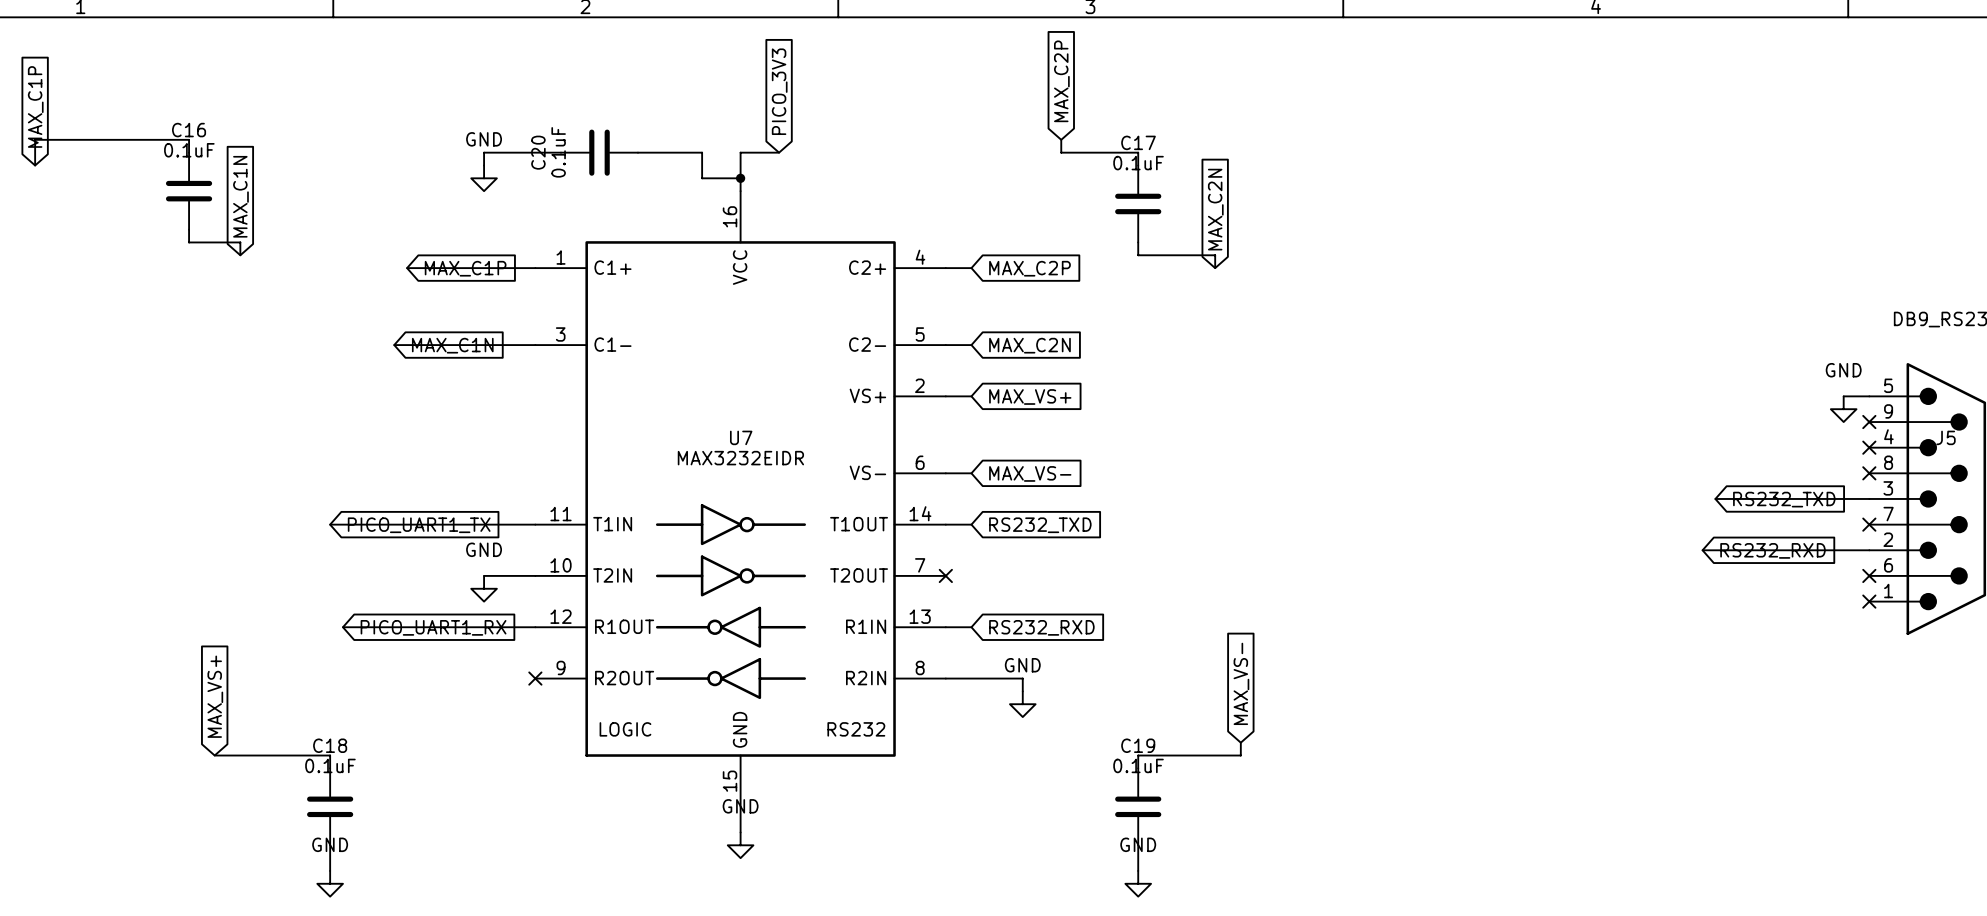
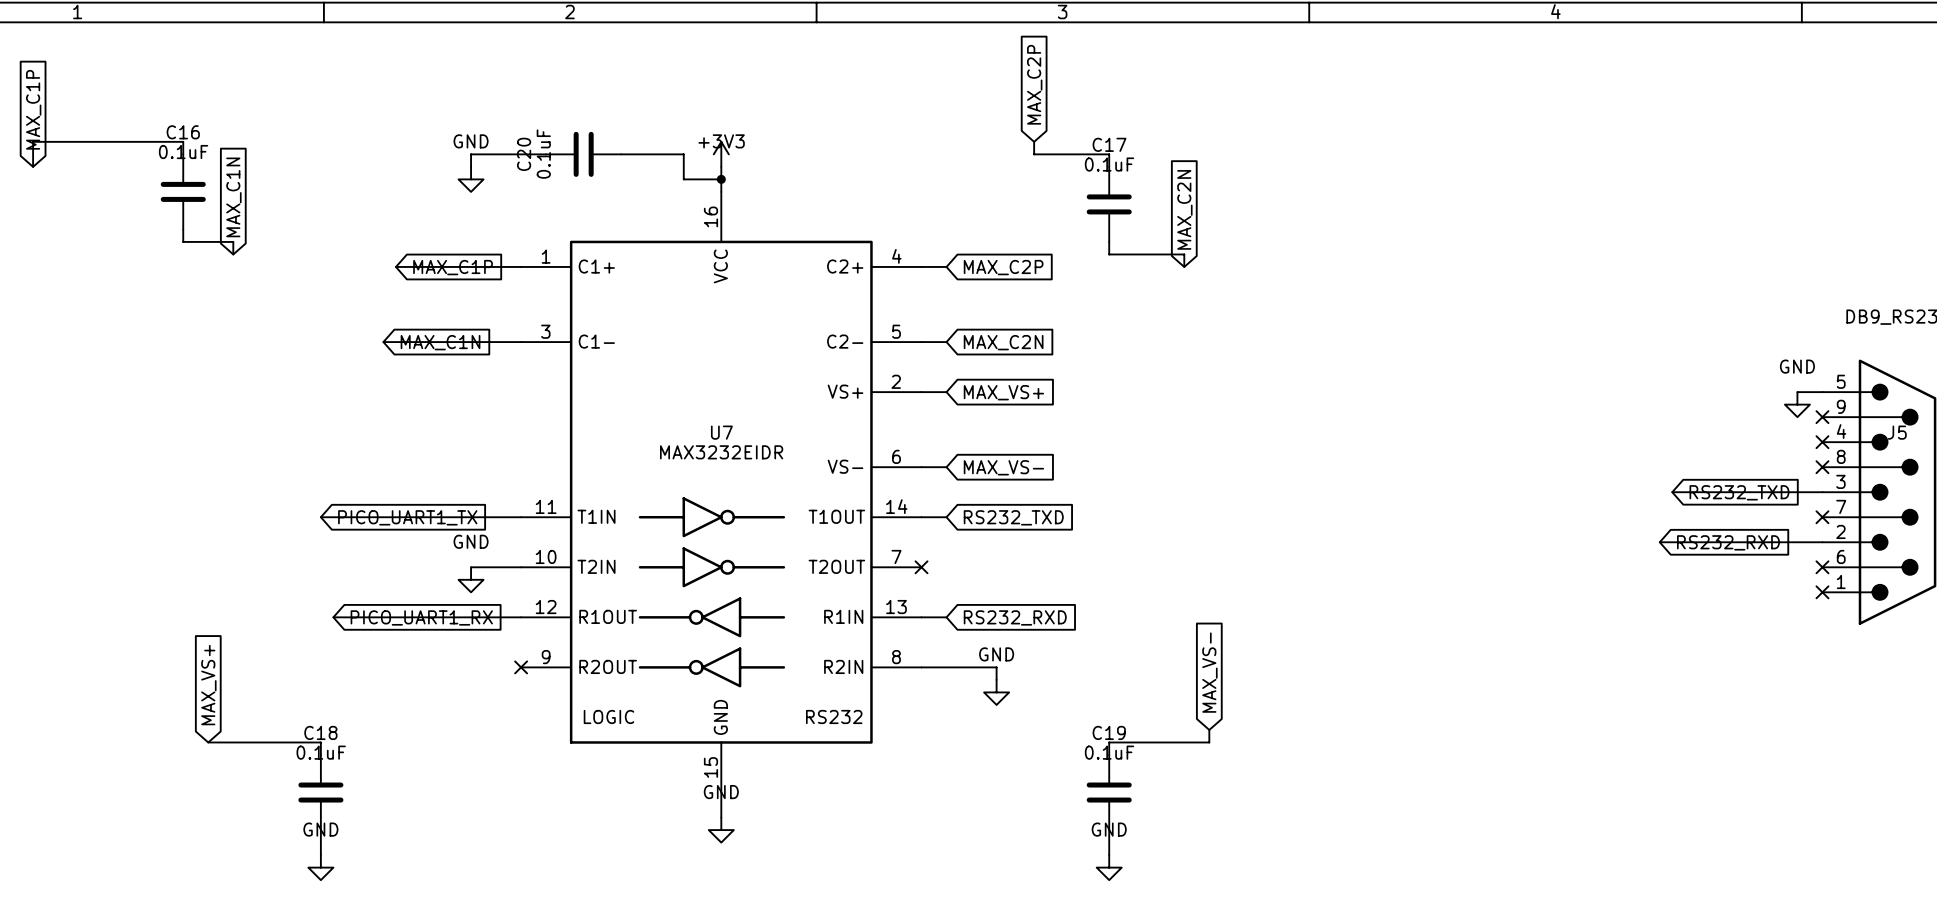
global label: PICO_3V3 (779, 91) -> none
power symbol: none -> +3V3 (721, 154)
wire: (779, 152) (740, 152) (740, 165) -> none

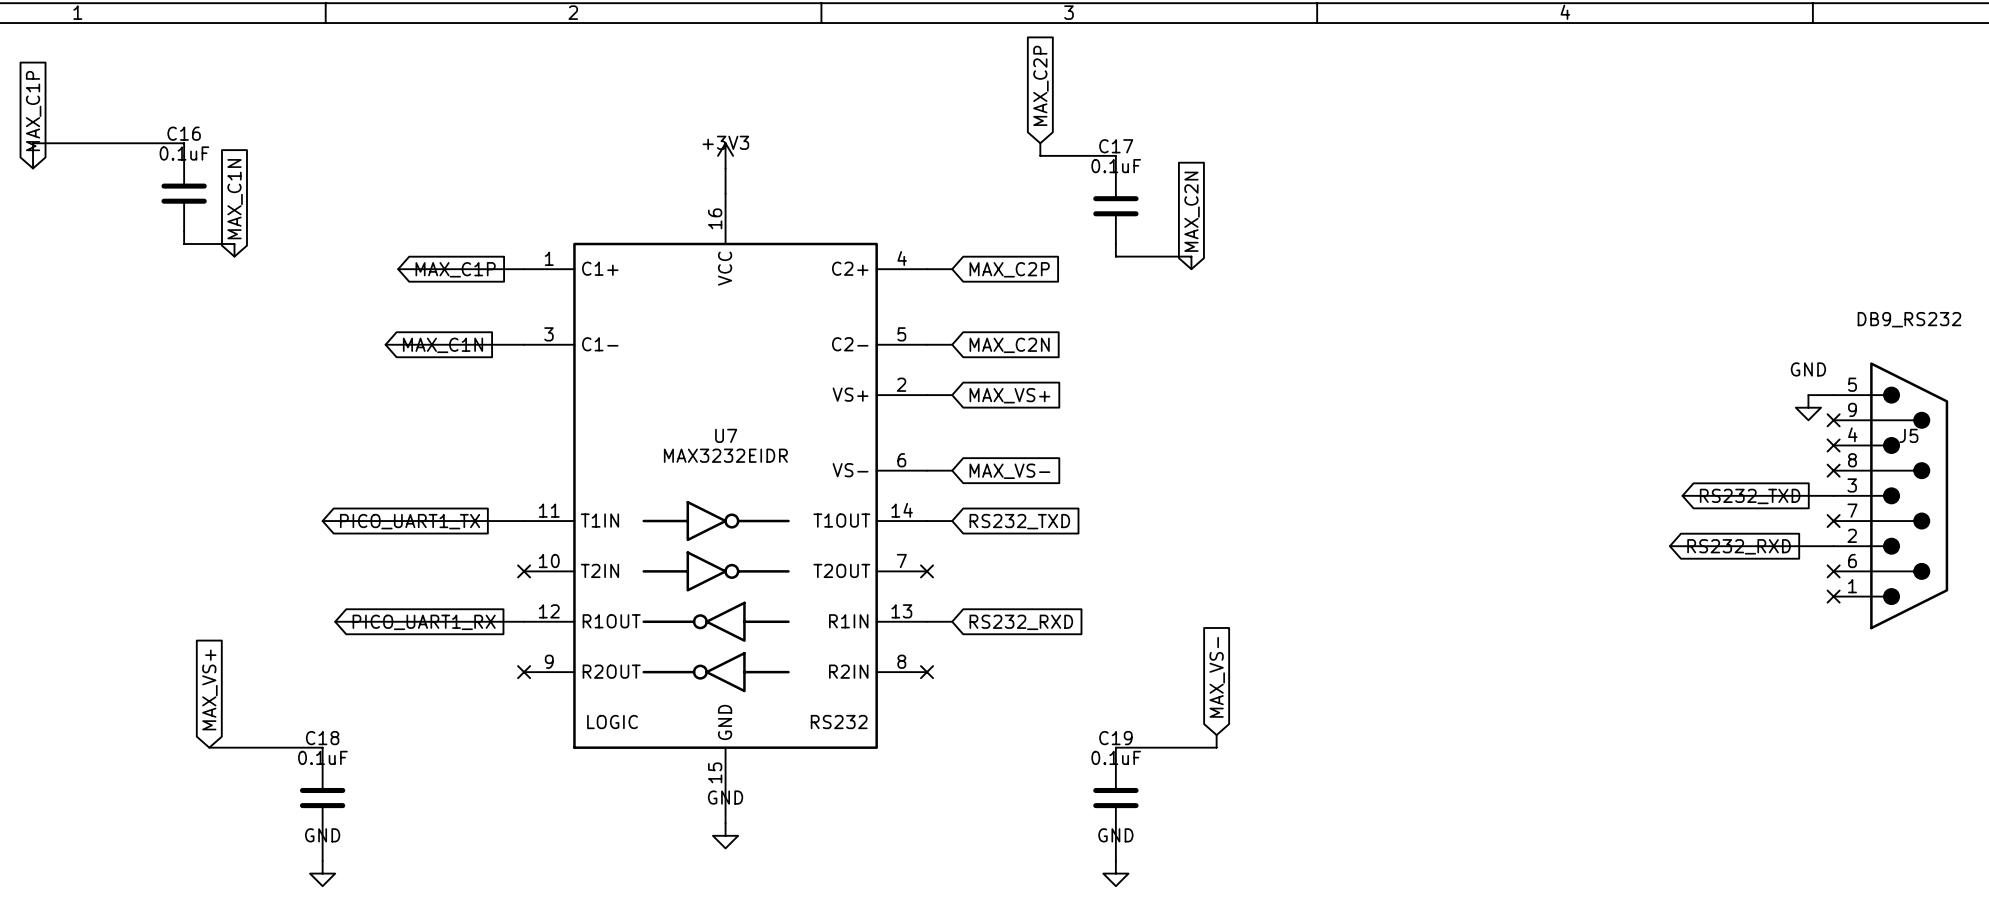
wire: (546, 154) (471, 154) (471, 166) -> none
C20: 0.1uF (583, 154) -> none
wire: (621, 154) (683, 154) (683, 179) (721, 179) -> none
power symbol: GND (471, 179) -> none
junction: (721, 179) -> none
wire: (471, 567) (521, 567) -> none
no-connect mark: none -> (524, 571)
power symbol: GND (471, 579) -> none
wire: (921, 667) (996, 667) (996, 679) -> none
no-connect mark: none -> (927, 672)
power symbol: GND (996, 692) -> none

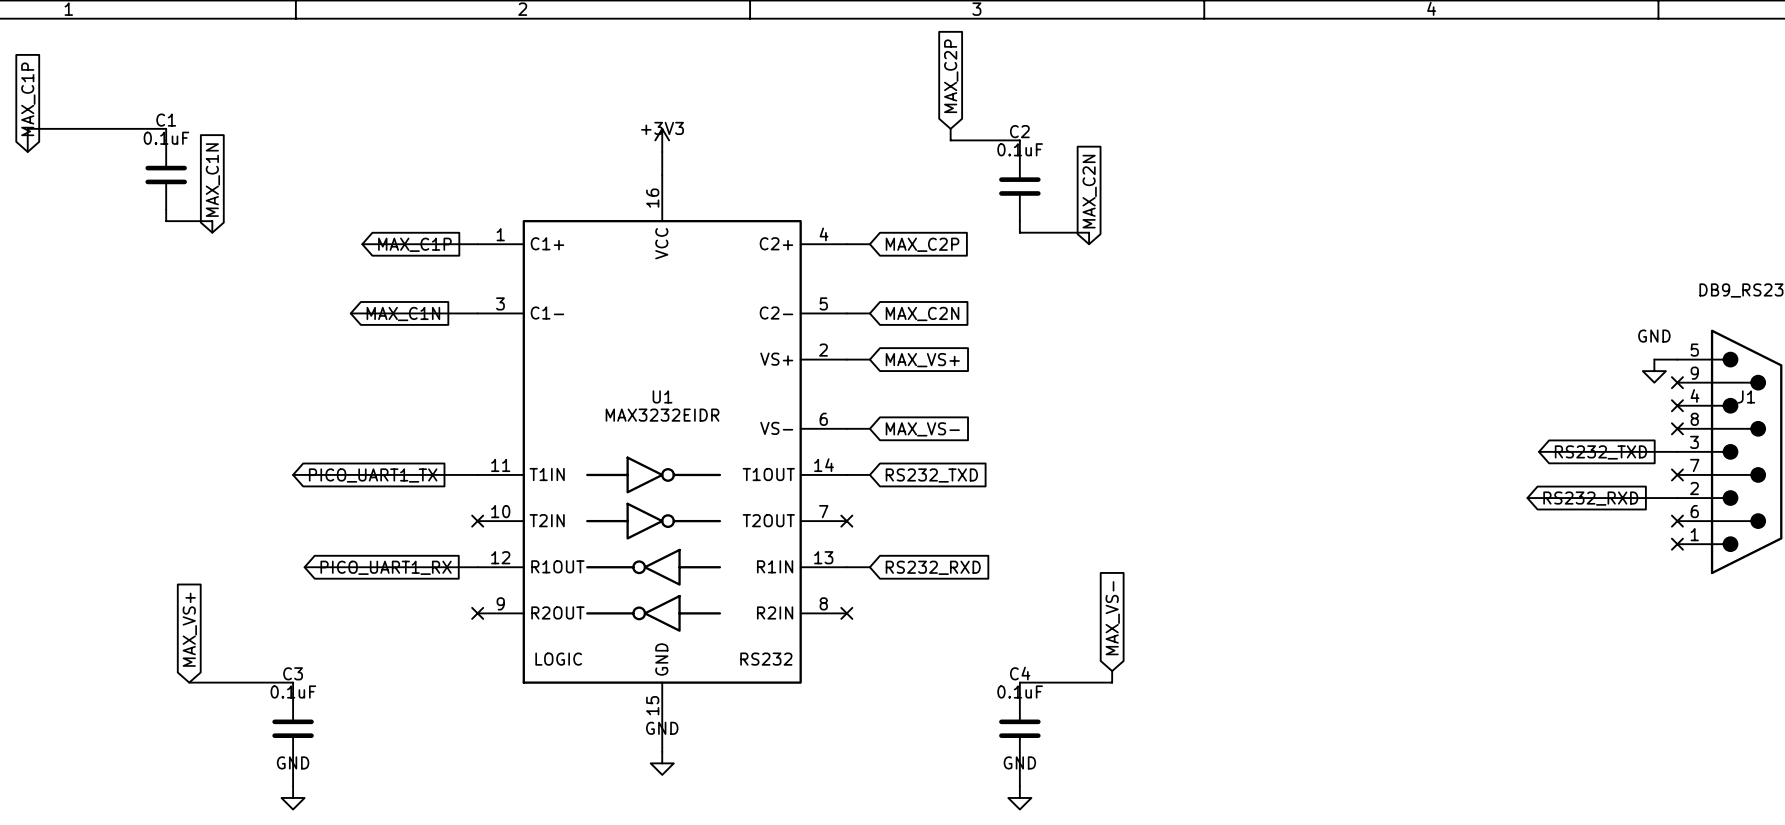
C16 name: C16 (184, 133) -> C1 (166, 120)
C17 name: C17 (1116, 146) -> C2 (1019, 131)
U7 name: U7 (726, 435) -> U1 (662, 396)
J5 name: J5 (1908, 435) -> J1 (1746, 396)
C18 name: C18 (322, 738) -> C3 (293, 673)
C19 name: C19 (1115, 738) -> C4 (1020, 673)

